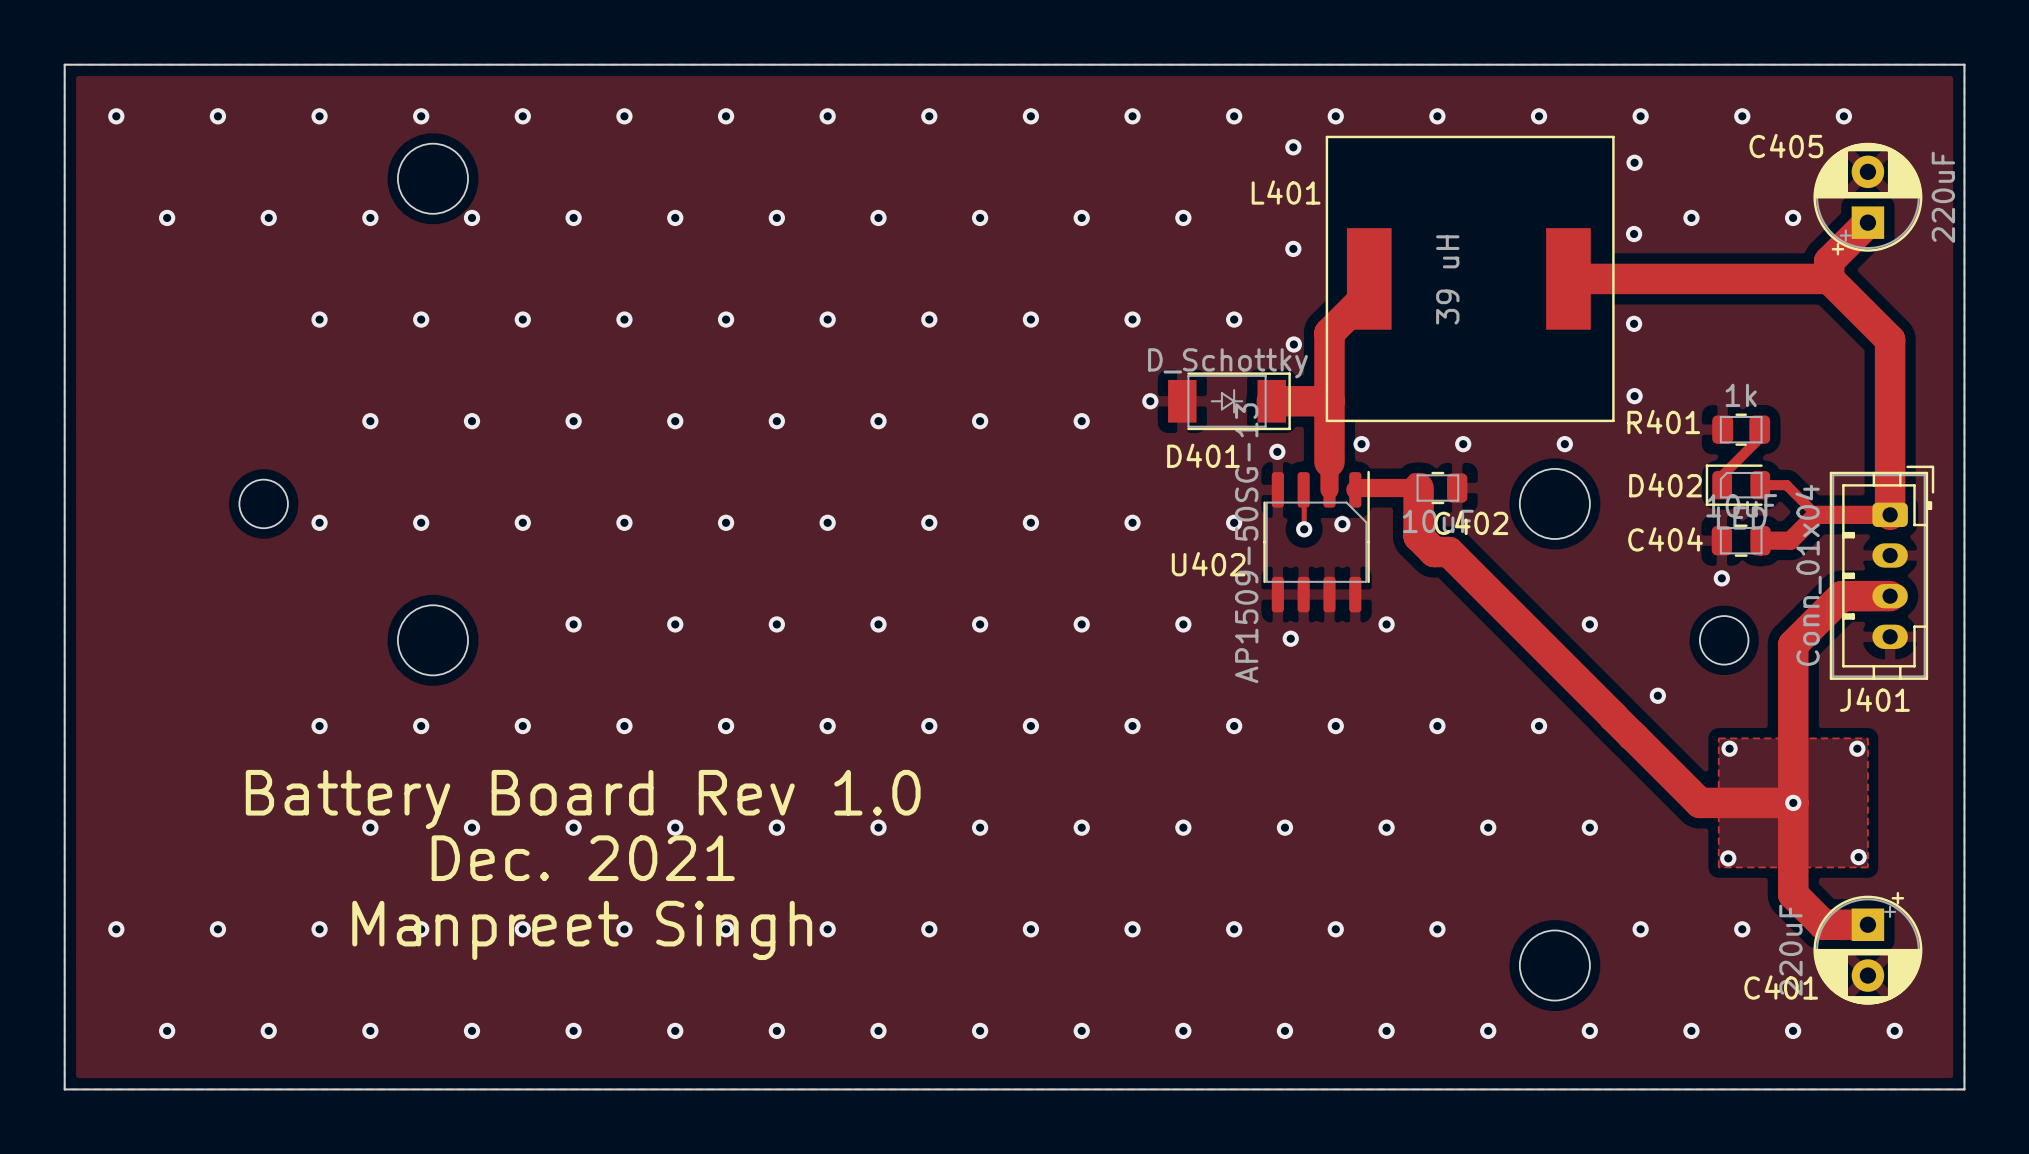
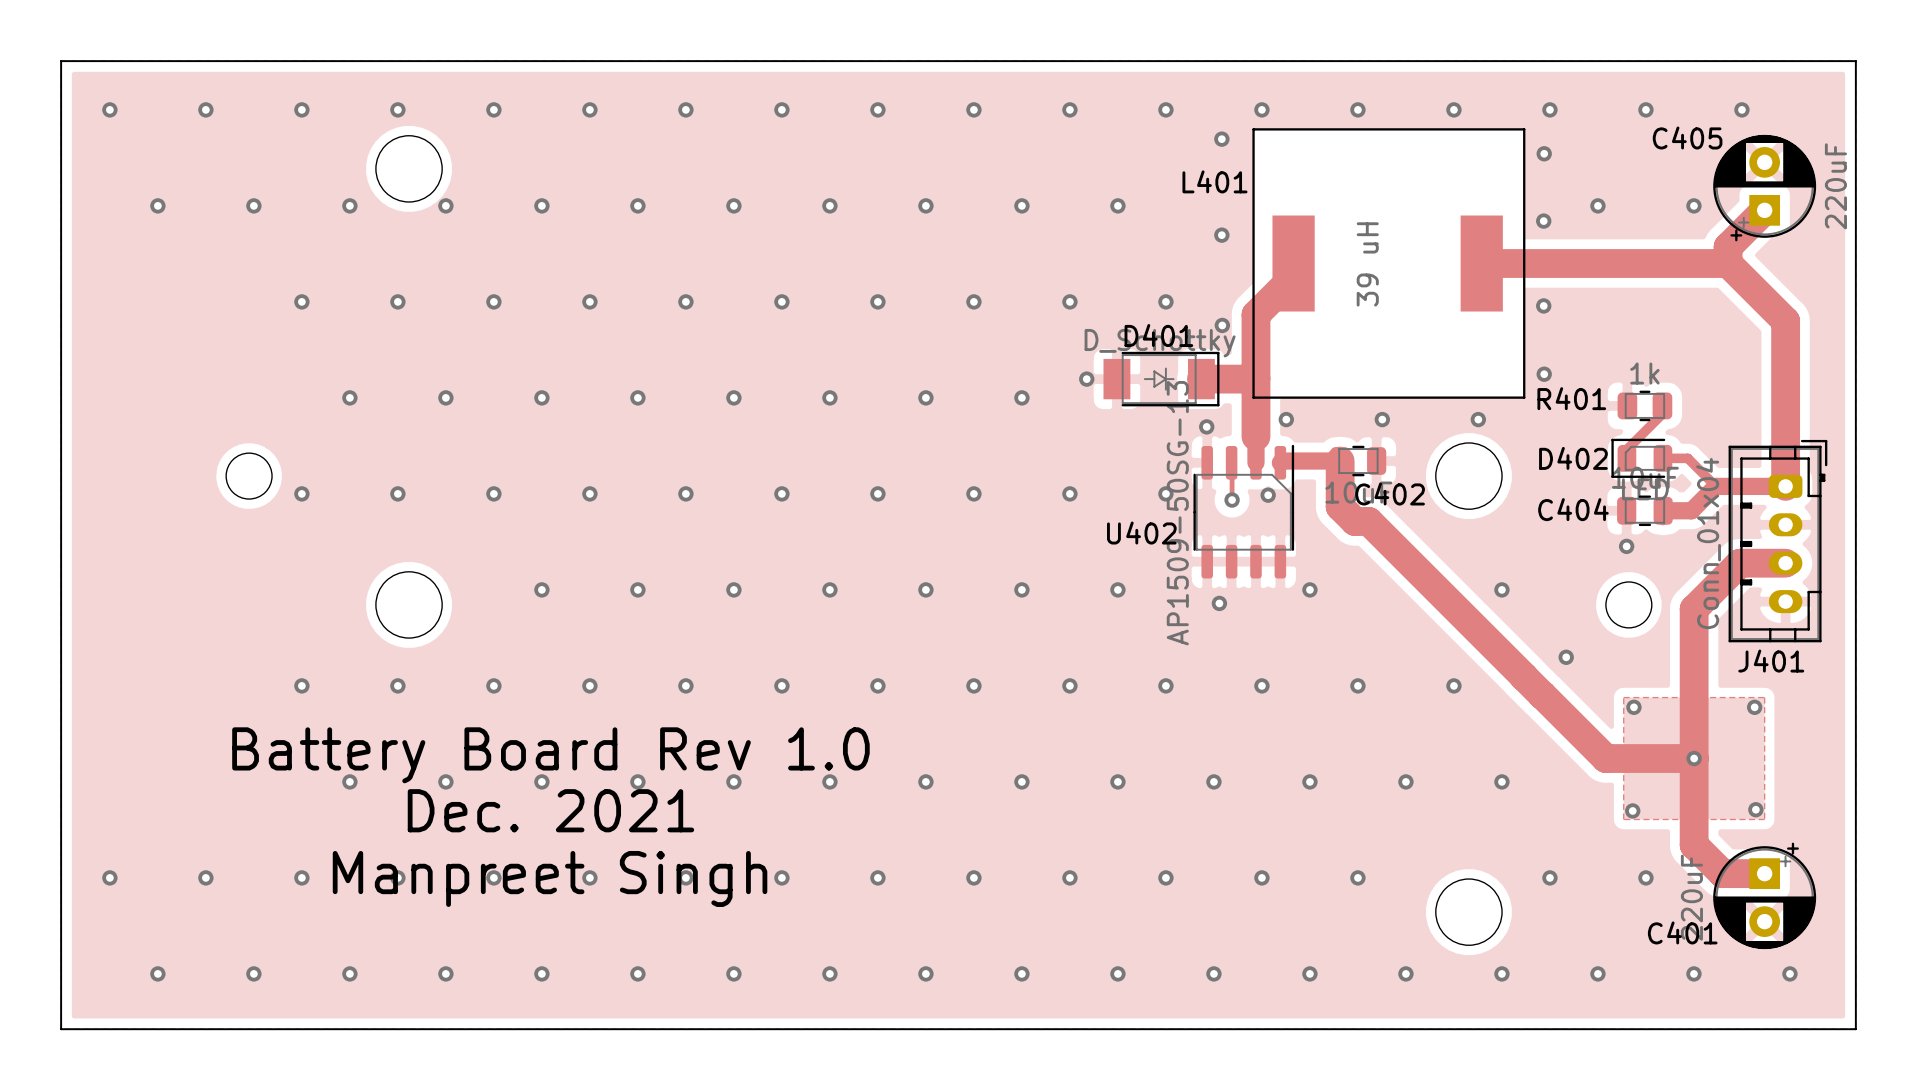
D401 name position: D401 (1203, 455) -> D401 (1158, 335)

